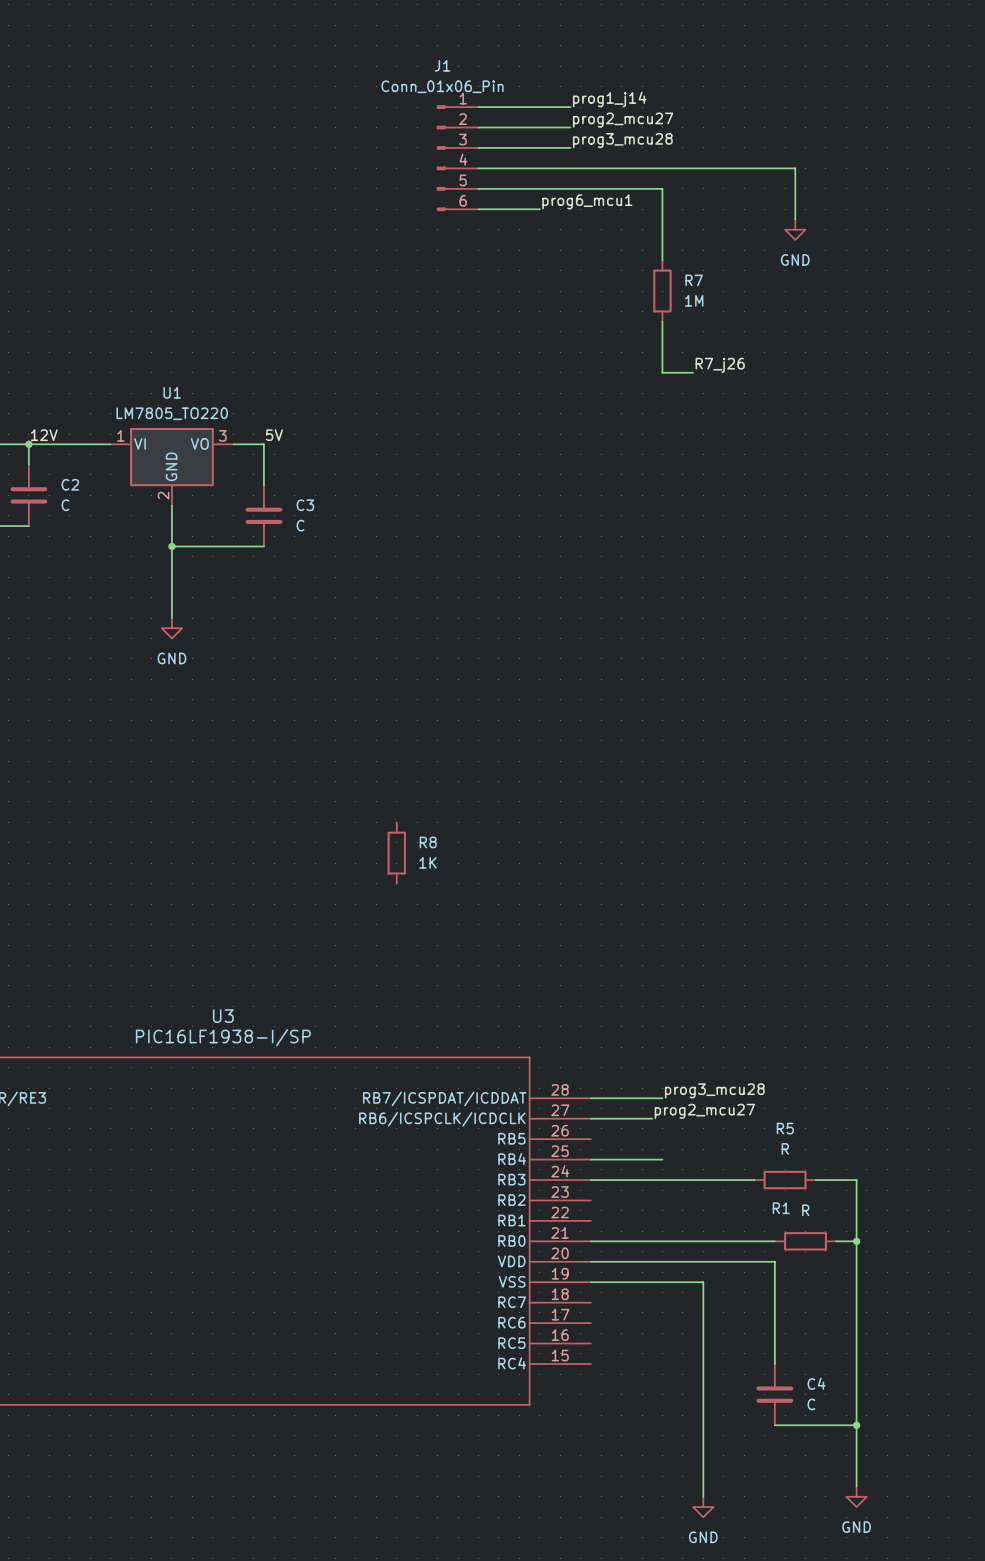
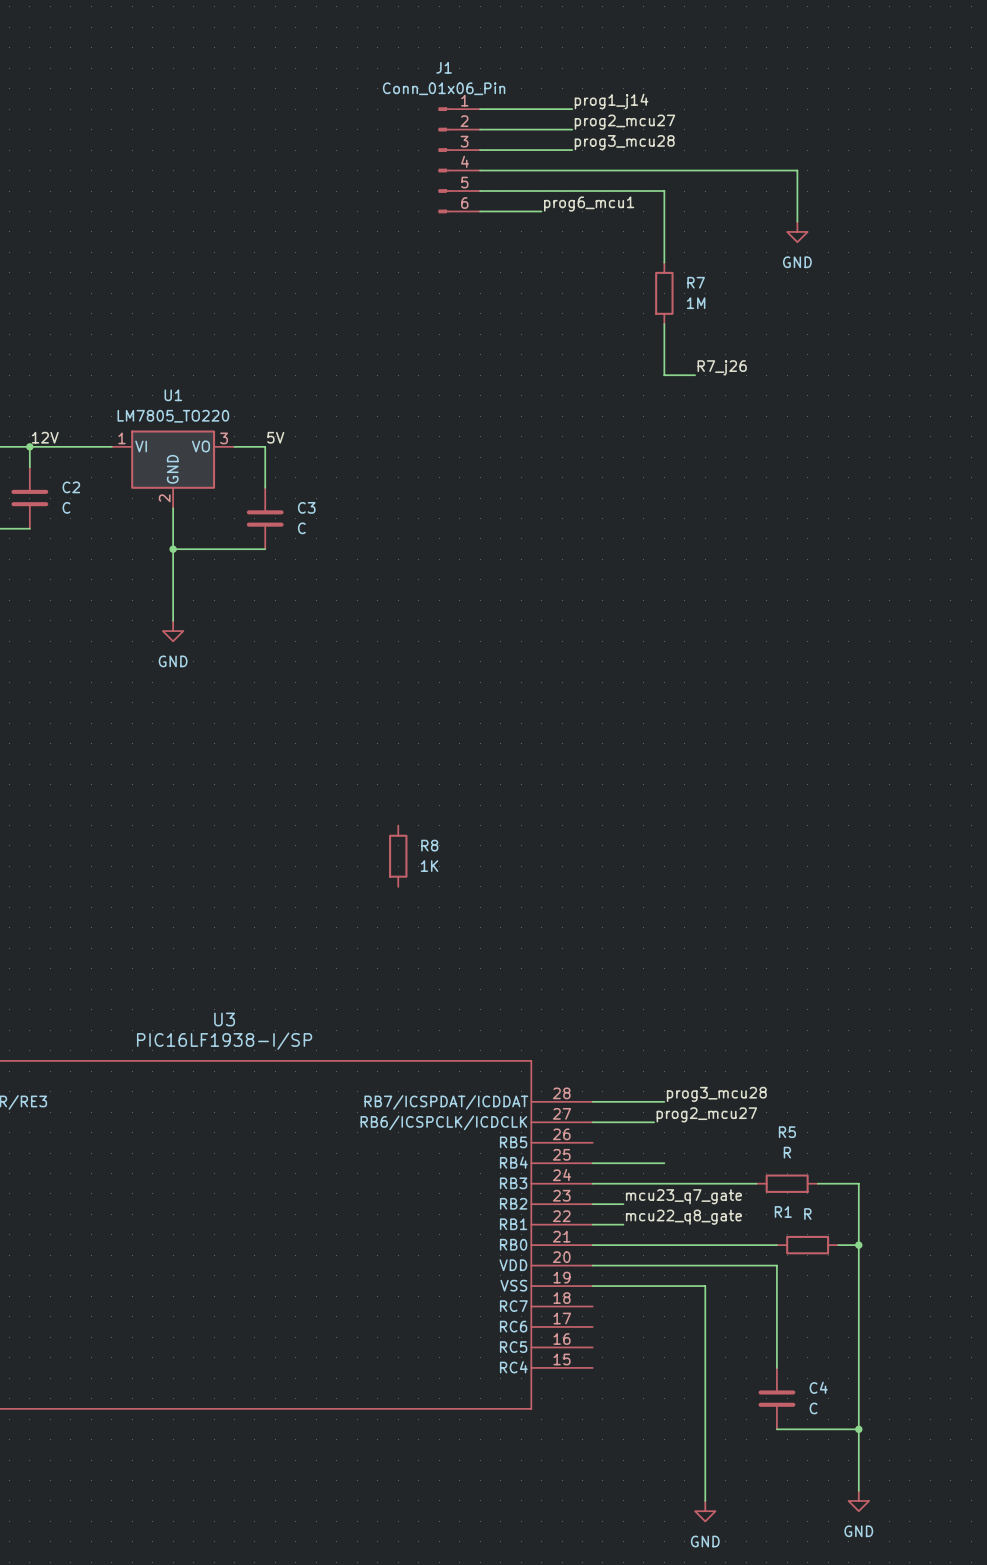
label: none -> mcu23_q7_gate (683, 1196)
wire: none -> (592, 1204) (623, 1204)
label: none -> mcu22_q8_gate (683, 1217)
wire: none -> (592, 1224) (623, 1224)

